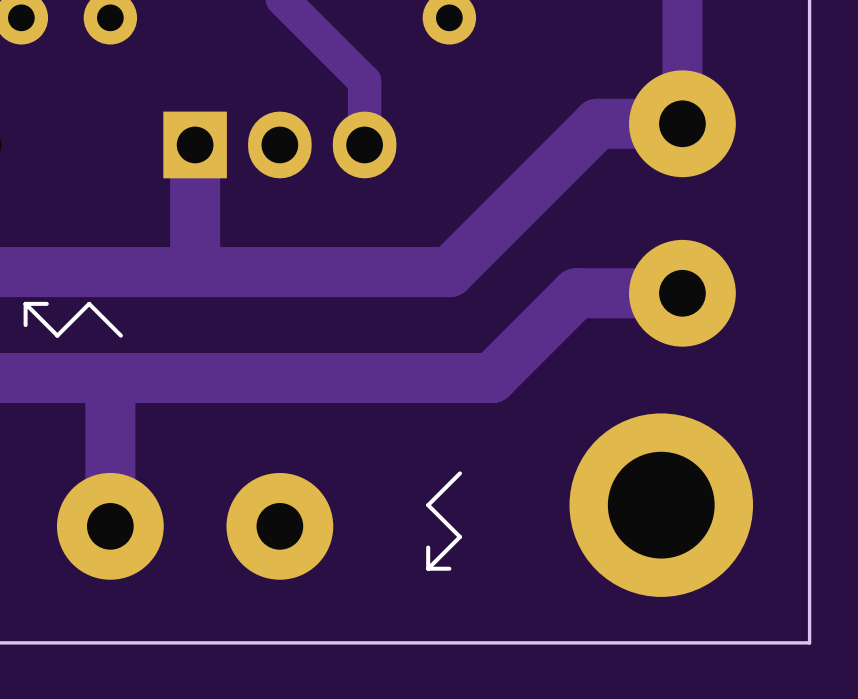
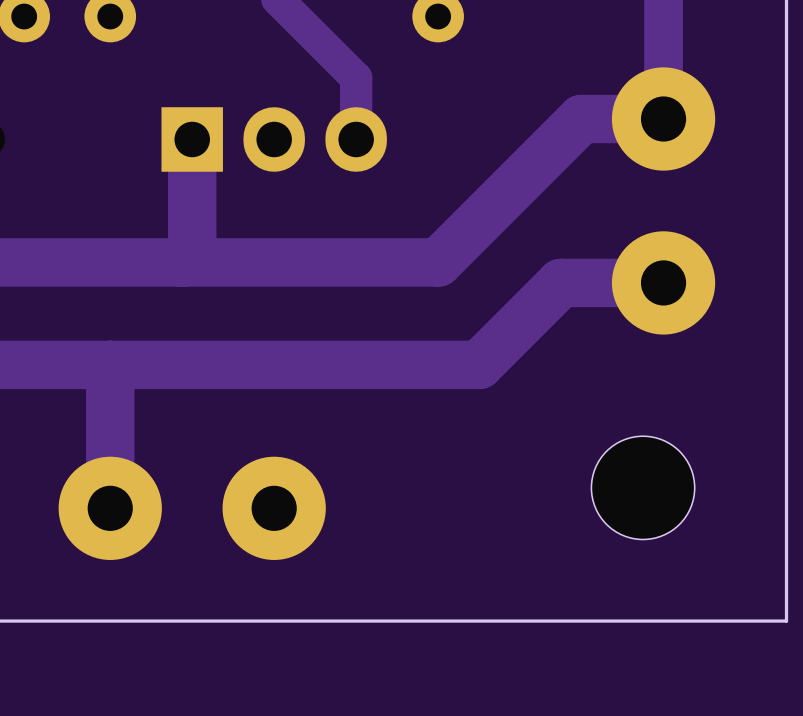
line: (25, 303) (57, 335) (89, 303) (120, 335) -> none
line: (25, 303) (25, 325) -> none
line: (46, 303) (25, 303) -> none
part footprint: [569, 413, 754, 597] -> [591, 436, 695, 540]
line: (459, 473) (428, 505) (459, 536) (428, 568) -> none
line: (428, 547) (428, 568) -> none
line: (449, 568) (428, 568) -> none

